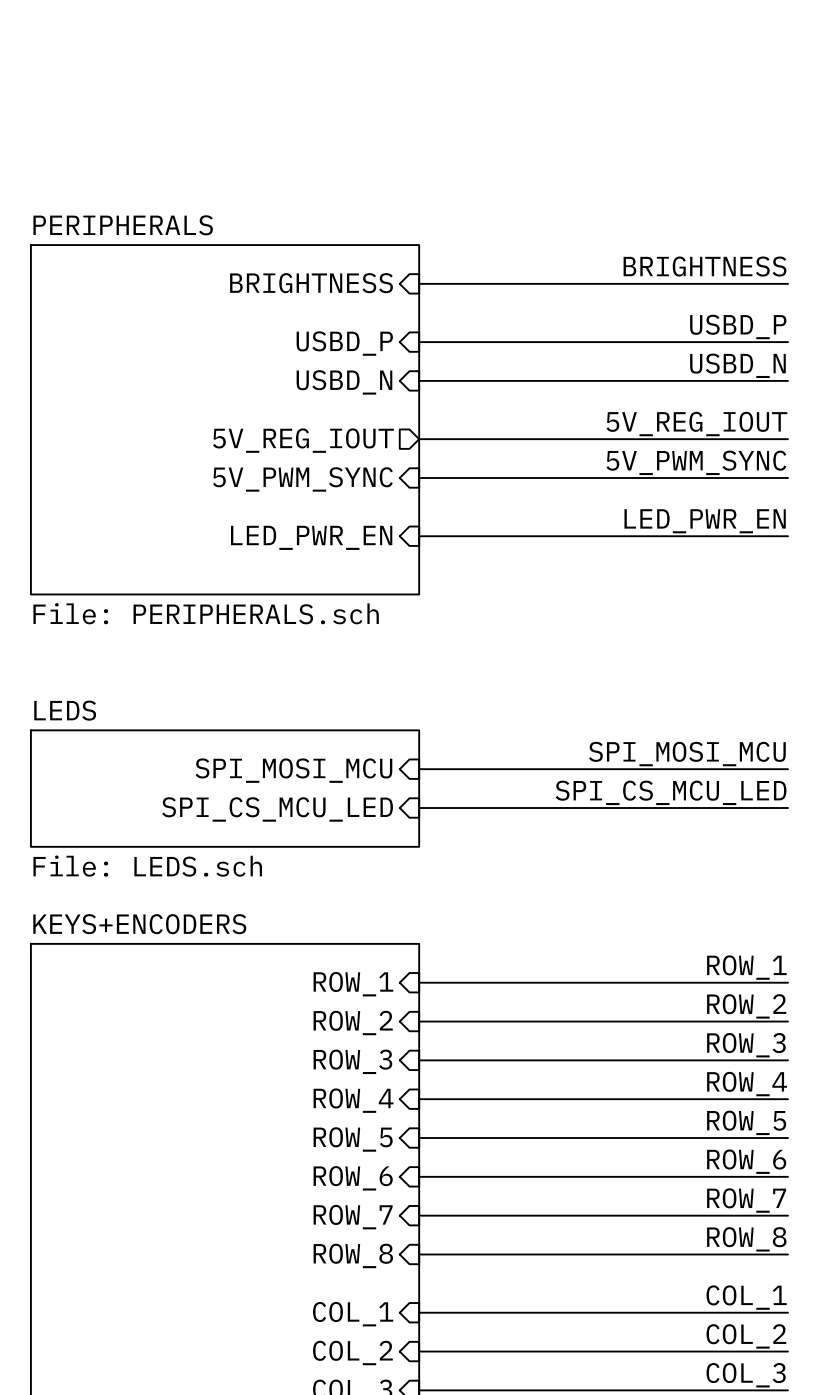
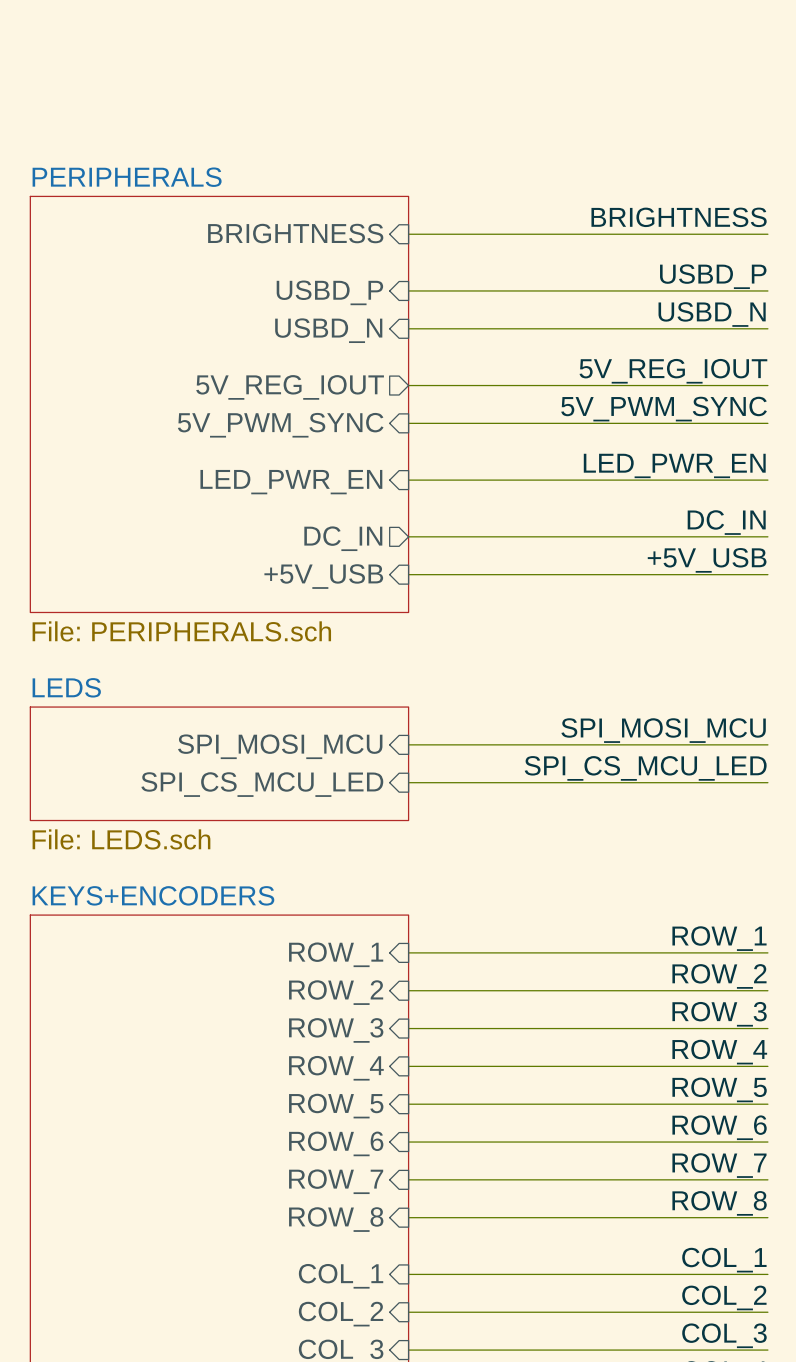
sheet PERIPHERALS name position: PERIPHERALS (123, 225) -> PERIPHERALS (127, 177)
sheet PERIPHERALS shape: [30, 245, 420, 595] -> [30, 196, 409, 613]
wire: none -> (408, 234) (767, 234)
label position: BRIGHTNESS (704, 266) -> BRIGHTNESS (679, 217)
sheet pin position: BRIGHTNESS (311, 283) -> BRIGHTNESS (295, 233)
wire: (419, 283) (788, 283) -> (408, 290) (767, 290)
label: none -> USBD_P (713, 276)
sheet pin: none -> USBD_P (329, 292)
label: USBD_P (738, 326) -> USBD_N (712, 314)
sheet pin: USBD_P (344, 343) -> USBD_N (328, 330)
label: USBD_N (737, 365) -> none
wire: (419, 380) (788, 380) -> (408, 385) (767, 385)
sheet pin: USBD_N (344, 382) -> none
label: none -> 5V_REG_IOUT (673, 371)
sheet pin: none -> 5V_REG_IOUT (290, 387)
label: 5V_REG_IOUT (696, 424) -> 5V_PWM_SYNC (664, 409)
sheet pin shape: output (303, 440) -> input (280, 425)
sheet pin: 5V_REG_IOUT (303, 440) -> 5V_PWM_SYNC (280, 425)
label: 5V_PWM_SYNC (696, 462) -> none
wire: (419, 477) (788, 477) -> (408, 480) (767, 480)
sheet pin: 5V_PWM_SYNC (302, 479) -> none
label position: LED_PWR_EN (705, 521) -> LED_PWR_EN (674, 465)
wire: (419, 536) (788, 536) -> (408, 536) (767, 536)
sheet pin position: LED_PWR_EN (311, 537) -> LED_PWR_EN (291, 482)
label: none -> DC_IN (726, 522)
sheet pin: none -> DC_IN (343, 538)
label: none -> +5V_USB (707, 560)
wire: none -> (408, 574) (767, 574)
sheet pin: none -> +5V_USB (323, 576)
sheet PERIPHERALS value position: File: PERIPHERALS.sch (206, 613) -> File: PERIPHERALS.sch (181, 631)

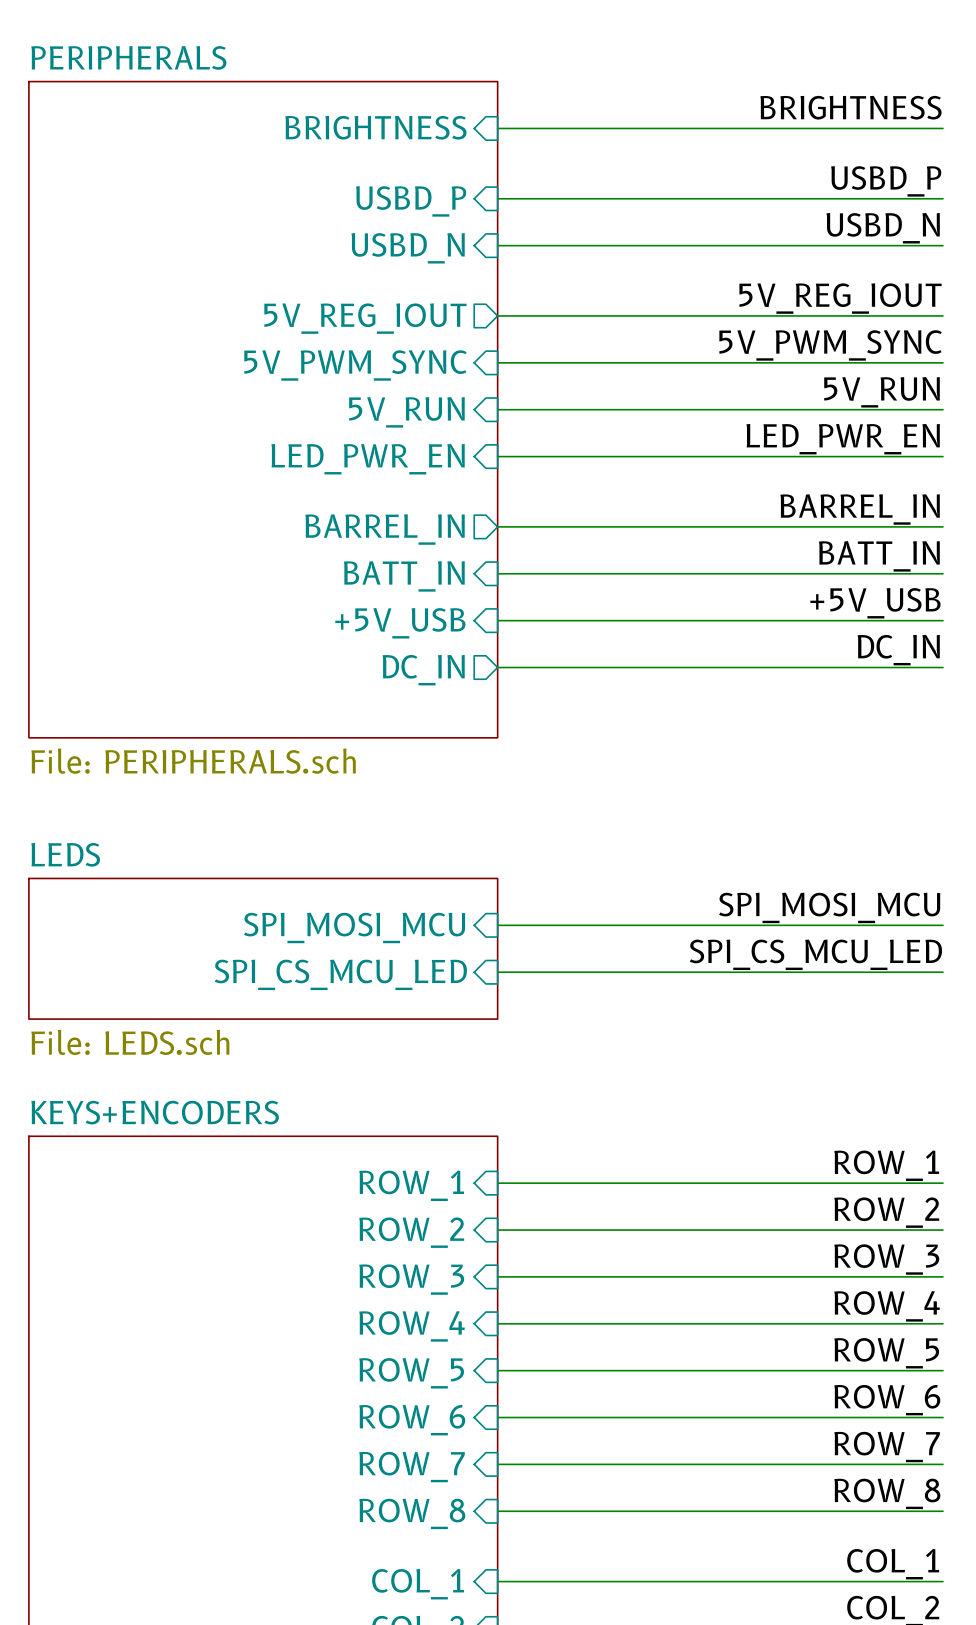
wire: none -> (497, 128) (942, 128)
label: none -> USBD_P (886, 181)
wire: none -> (497, 198) (942, 198)
sheet pin: none -> USBD_P (411, 201)
label: none -> USBD_N (883, 228)
wire: none -> (497, 245) (942, 245)
sheet pin: none -> USBD_N (408, 248)
label position: BRIGHTNESS (679, 217) -> BRIGHTNESS (850, 107)
sheet pin position: BRIGHTNESS (295, 233) -> BRIGHTNESS (375, 127)
wire: (408, 234) (767, 234) -> (497, 315) (942, 315)
label: USBD_P (713, 276) -> 5V_PWM_SYNC (830, 345)
sheet pin: USBD_P (329, 292) -> 5V_PWM_SYNC (355, 365)
label: USBD_N (712, 314) -> 5V_RUN (882, 392)
sheet PERIPHERALS: none -> File: PERIPHERALS.sch (263, 409)
sheet pin: USBD_N (328, 330) -> 5V_RUN (406, 412)
label position: 5V_REG_IOUT (673, 371) -> 5V_REG_IOUT (840, 298)
wire: (408, 385) (767, 385) -> (497, 456) (942, 456)
sheet pin position: 5V_REG_IOUT (290, 387) -> 5V_REG_IOUT (365, 318)
sheet PERIPHERALS: File: PERIPHERALS.sch (219, 404) -> none
label: 5V_PWM_SYNC (664, 409) -> BARREL_IN (860, 509)
sheet pin shape: input (280, 425) -> output (385, 529)
sheet pin: 5V_PWM_SYNC (280, 425) -> BARREL_IN (385, 529)
label: none -> BATT_IN (879, 556)
sheet pin: none -> BATT_IN (404, 576)
label position: LED_PWR_EN (674, 465) -> LED_PWR_EN (843, 439)
wire: (408, 480) (767, 480) -> (497, 573) (942, 573)
sheet pin position: LED_PWR_EN (291, 482) -> LED_PWR_EN (368, 459)
label position: +5V_USB (707, 560) -> +5V_USB (875, 603)
wire: (408, 574) (767, 574) -> (497, 620) (942, 620)
sheet pin position: +5V_USB (323, 576) -> +5V_USB (400, 623)

